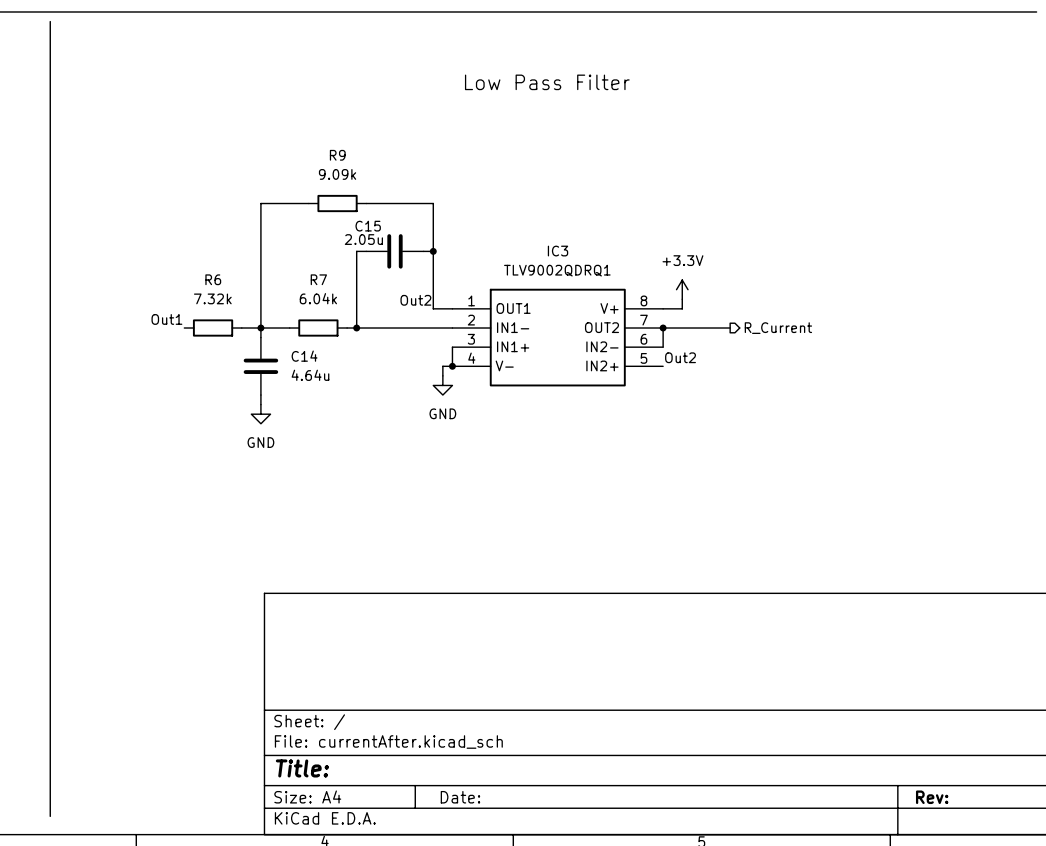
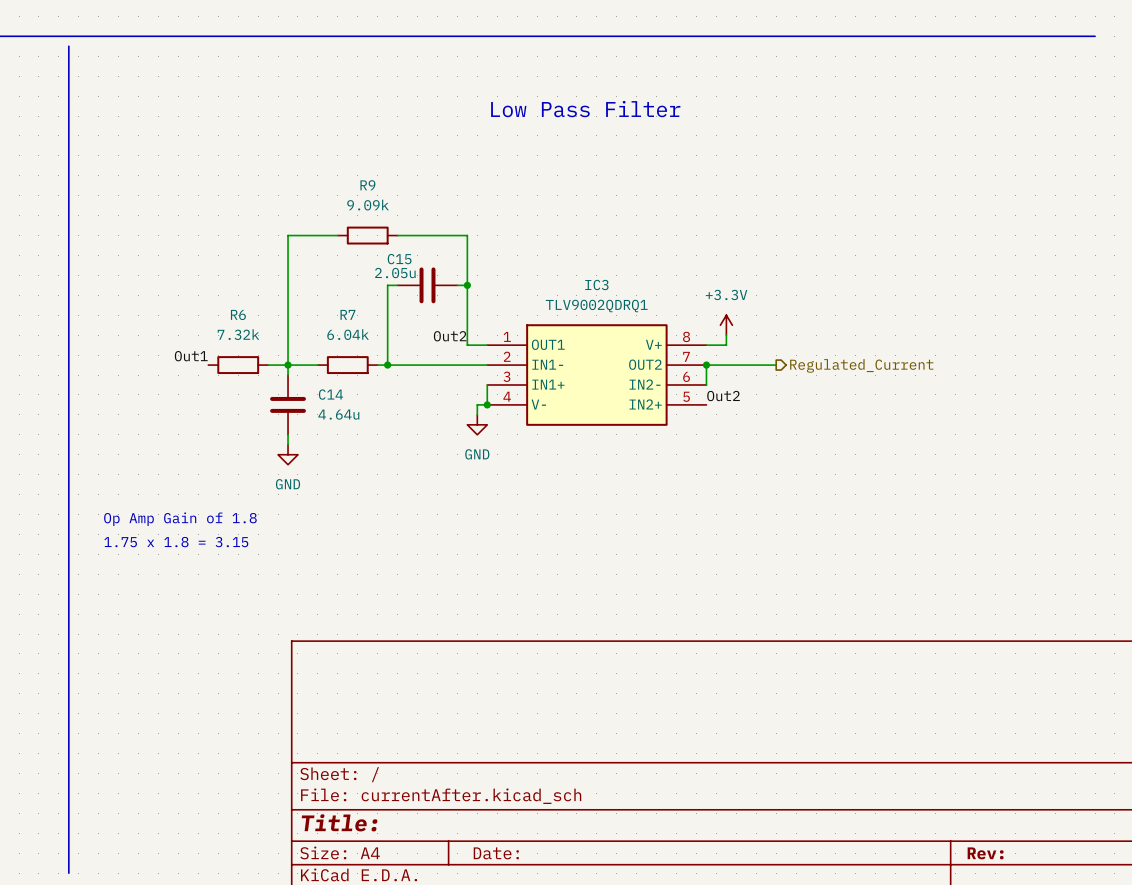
hierarchical label: R_Current (778, 328) -> Regulated_Current (861, 365)
text: none -> Op Amp Gain of 1.8 (180, 519)
text: none -> 1.75 x 1.8 = 3.15 (176, 542)

